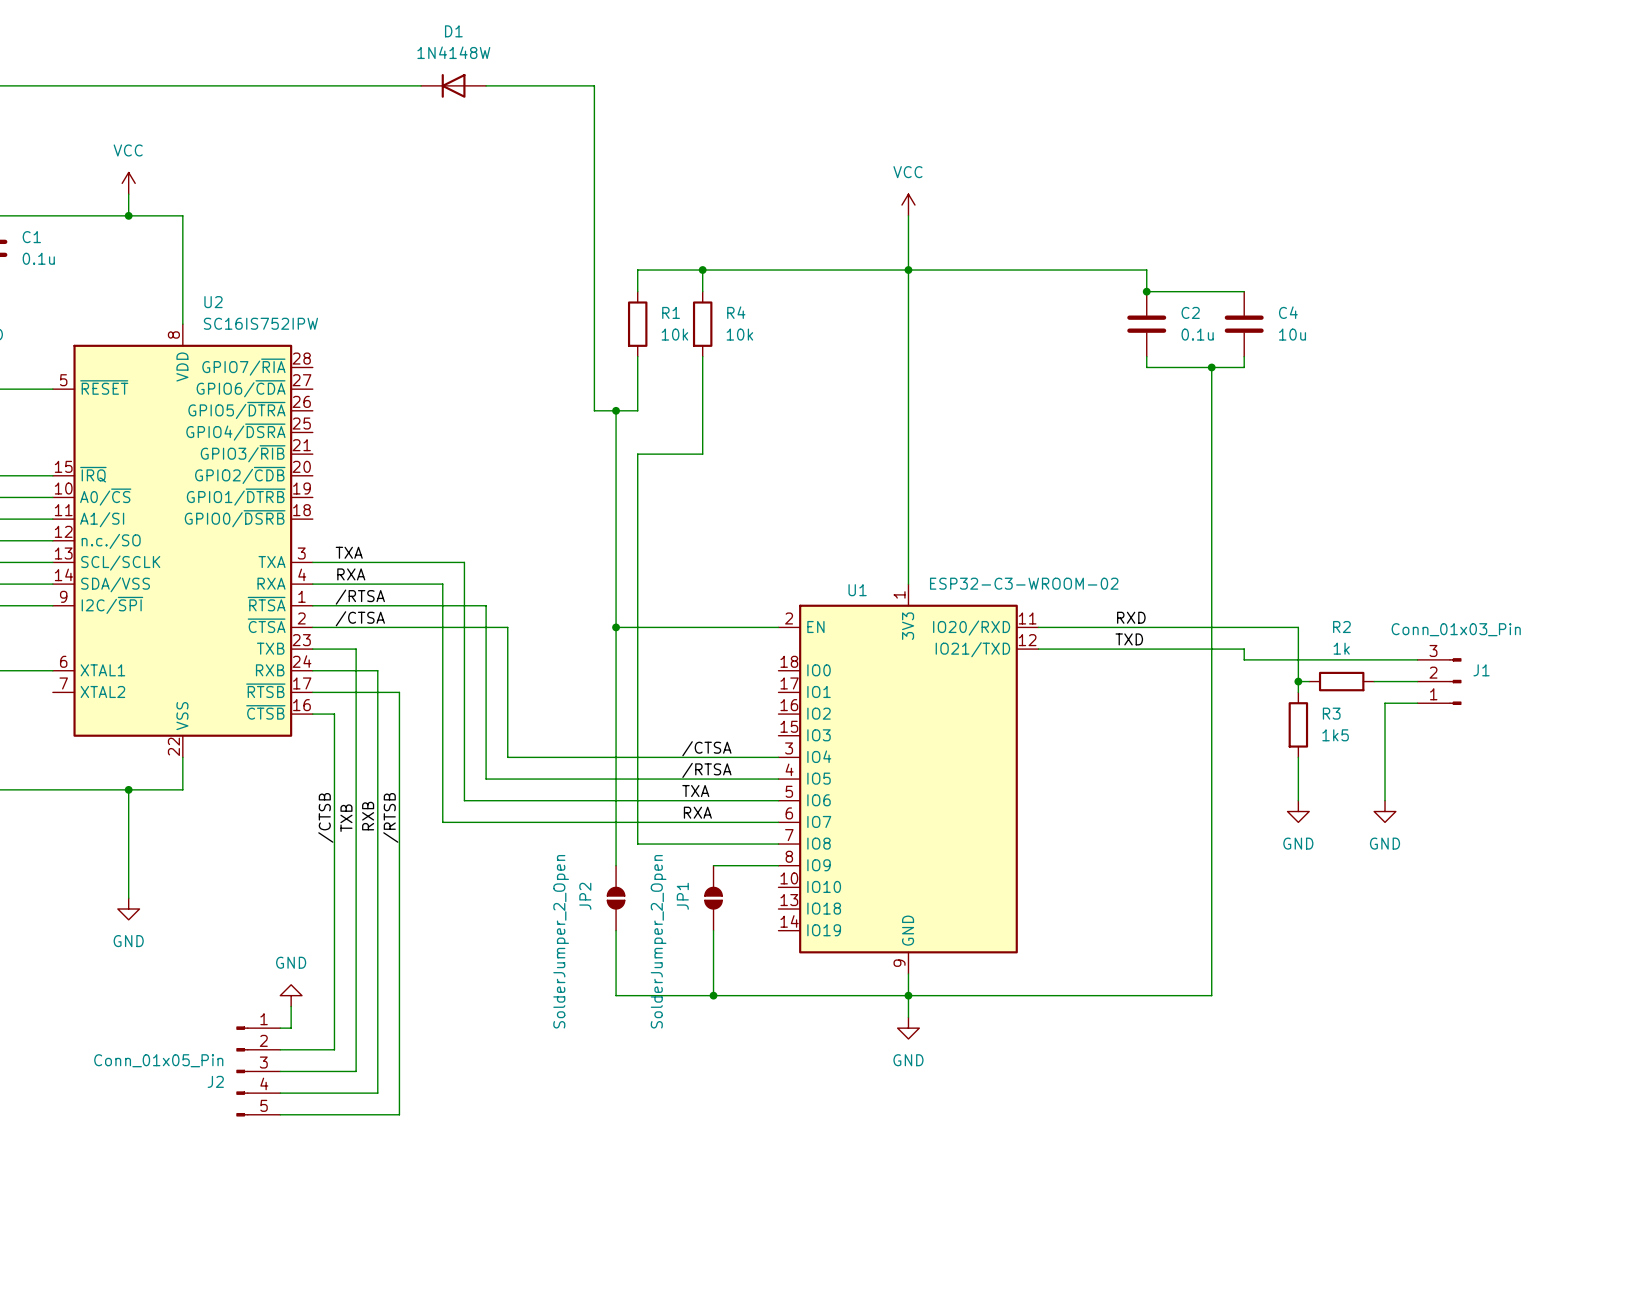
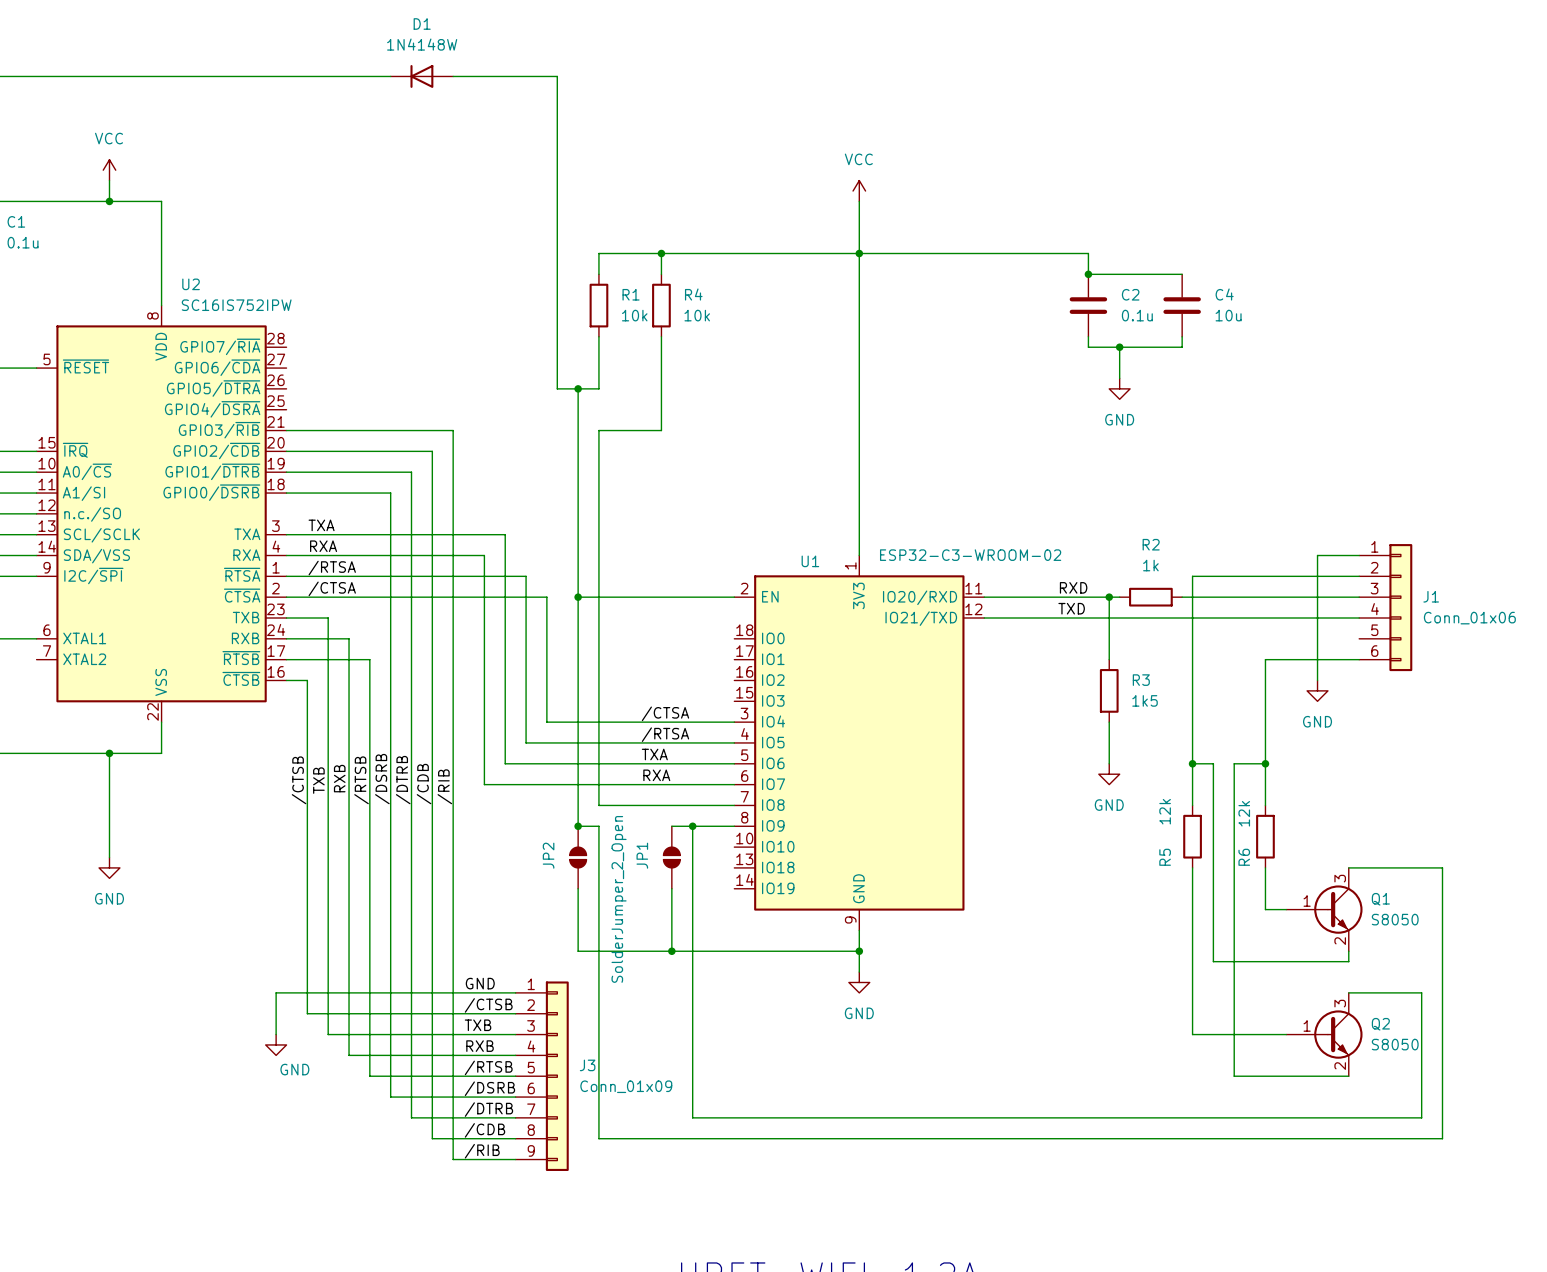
wire: none -> (1119, 347) (1119, 378)
wire: (1211, 367) (1211, 995) (908, 995) -> none
junction position: (1211, 367) -> (1119, 347)
power symbol: none -> GND (1119, 388)
wire: none -> (286, 472) (411, 472) (411, 555) (484, 555) (484, 784)
wire: none -> (286, 493) (390, 493) (390, 1097) (515, 1097)
wire: none -> (1359, 576) (1192, 576) (1192, 805)
wire: (507, 627) (507, 757) (583, 757) -> (473, 597) (546, 597) (546, 722)
wire: none -> (1109, 597) (1109, 659)
junction: none -> (1109, 597)
wire: (1179, 627) (1244, 627) -> none
wire: (1298, 627) (1298, 692) -> (1234, 597) (1359, 597)
J1 value: Conn_01x03_Pin (1456, 629) -> Conn_01x06 (1469, 618)
wire: (1244, 649) (1244, 659) (1417, 659) -> (1182, 617) (1359, 617)
J1 symbol: [1417, 658, 1462, 705] -> [1359, 544, 1413, 672]
wire: (1298, 681) (1309, 681) -> none
junction: (1298, 681) -> none
R2 position: (1341, 681) -> (1150, 597)
wire: (1374, 681) (1417, 681) -> none
wire: none -> (1359, 659) (1265, 659) (1265, 805)
wire: (1385, 703) (1417, 703) -> (1317, 670) (1317, 555) (1359, 555)
wire: (1385, 714) (1385, 800) -> none
R3 position: (1298, 724) -> (1109, 690)
power symbol: none -> GND (1317, 690)
wire: (1298, 757) (1298, 800) -> (1109, 722) (1109, 763)
wire: (486, 779) (561, 779) -> (286, 430) (453, 430) (453, 576) (526, 576) (526, 742)
wire: none -> (453, 742) (453, 1159) (515, 1159)
wire: (464, 800) (540, 800) -> (286, 451) (432, 451) (432, 534) (505, 534) (505, 763)
wire: none -> (432, 763) (432, 1138) (515, 1138)
wire: none -> (1192, 763) (1213, 763) (1213, 961) (1348, 961) (1348, 951)
junction: none -> (1192, 763)
wire: none -> (1265, 763) (1234, 763) (1234, 1076) (1348, 1076)
junction: none -> (1265, 763)
power symbol: none -> GND (1109, 774)
power symbol: GND (1298, 811) -> none
power symbol: GND (1385, 811) -> none
label: none -> /DSRB (382, 779)
label: none -> /DTRB (403, 780)
label: none -> /CDB (424, 784)
wire: (442, 822) (518, 822) -> (411, 784) (411, 1117) (515, 1117)
label: none -> /RIB (444, 786)
wire: none -> (578, 826) (598, 826) (598, 1138) (1442, 1138) (1442, 867) (1348, 867)
junction: none -> (578, 826)
wire: none -> (692, 826) (692, 1117) (1421, 1117) (1421, 992) (1348, 992)
junction: none -> (692, 826)
R5: none -> 12k (1192, 836)
R6: none -> 12k (1265, 836)
wire: none -> (1192, 867) (1192, 1034) (1286, 1034)
wire: none -> (1265, 867) (1265, 909) (1286, 909)
JP2 value: SolderJumper_2_Open (561, 941) -> none
Q1: none -> S8050 (1324, 909)
power symbol text position: GND (291, 962) -> GND (294, 1069)
power symbol rotation: 0° (291, 995) -> 180° (276, 1044)
power symbol position: GND (291, 995) -> GND (276, 1044)
wire: (291, 1006) (291, 1028) (280, 1028) -> none
label: none -> GND (480, 983)
wire: none -> (515, 992) (276, 992) (276, 1034)
wire: (280, 1049) (334, 1049) -> (515, 1013) (307, 1013) (307, 1003)
label: none -> /CTSB (488, 1005)
J2: Conn_01x05_Pin (258, 1071) -> none
wire: (280, 1071) (356, 1071) -> (515, 1034) (328, 1034) (328, 1024)
label: none -> TXB (478, 1025)
Q2: none -> S8050 (1324, 1034)
wire: (280, 1093) (377, 1093) -> (515, 1055) (349, 1055) (349, 1044)
label: none -> RXB (480, 1046)
wire: (280, 1114) (399, 1114) -> (515, 1076) (369, 1076) (369, 1065)
label: none -> /RTSB (488, 1067)
J3: none -> Conn_01x09 (542, 1076)
label: none -> /DSRB (489, 1088)
label: none -> /DTRB (488, 1109)
label: none -> /CDB (484, 1130)
label: none -> /RIB (482, 1151)

